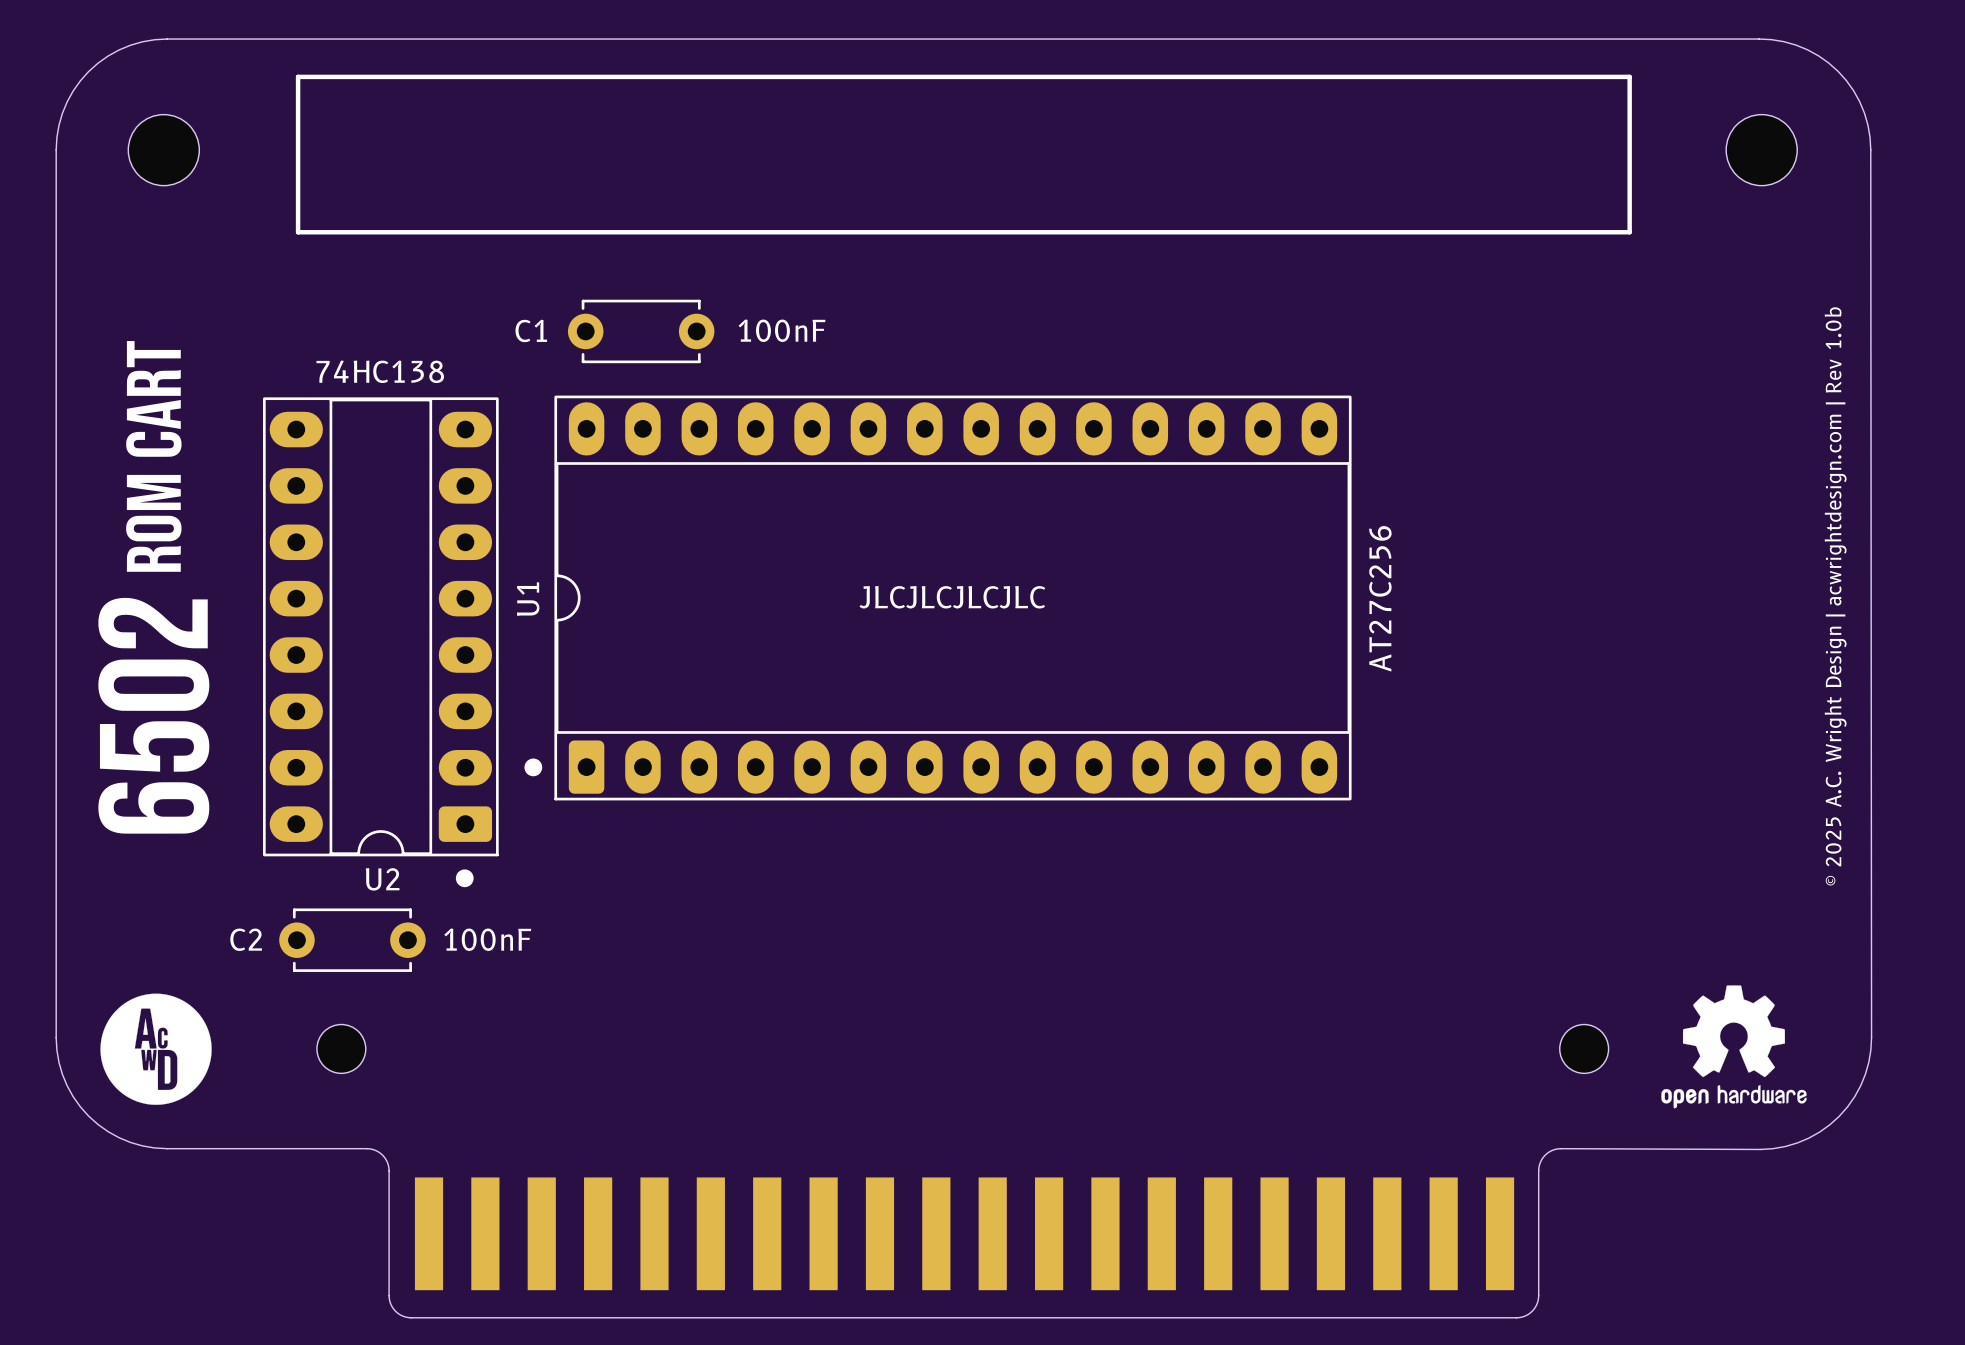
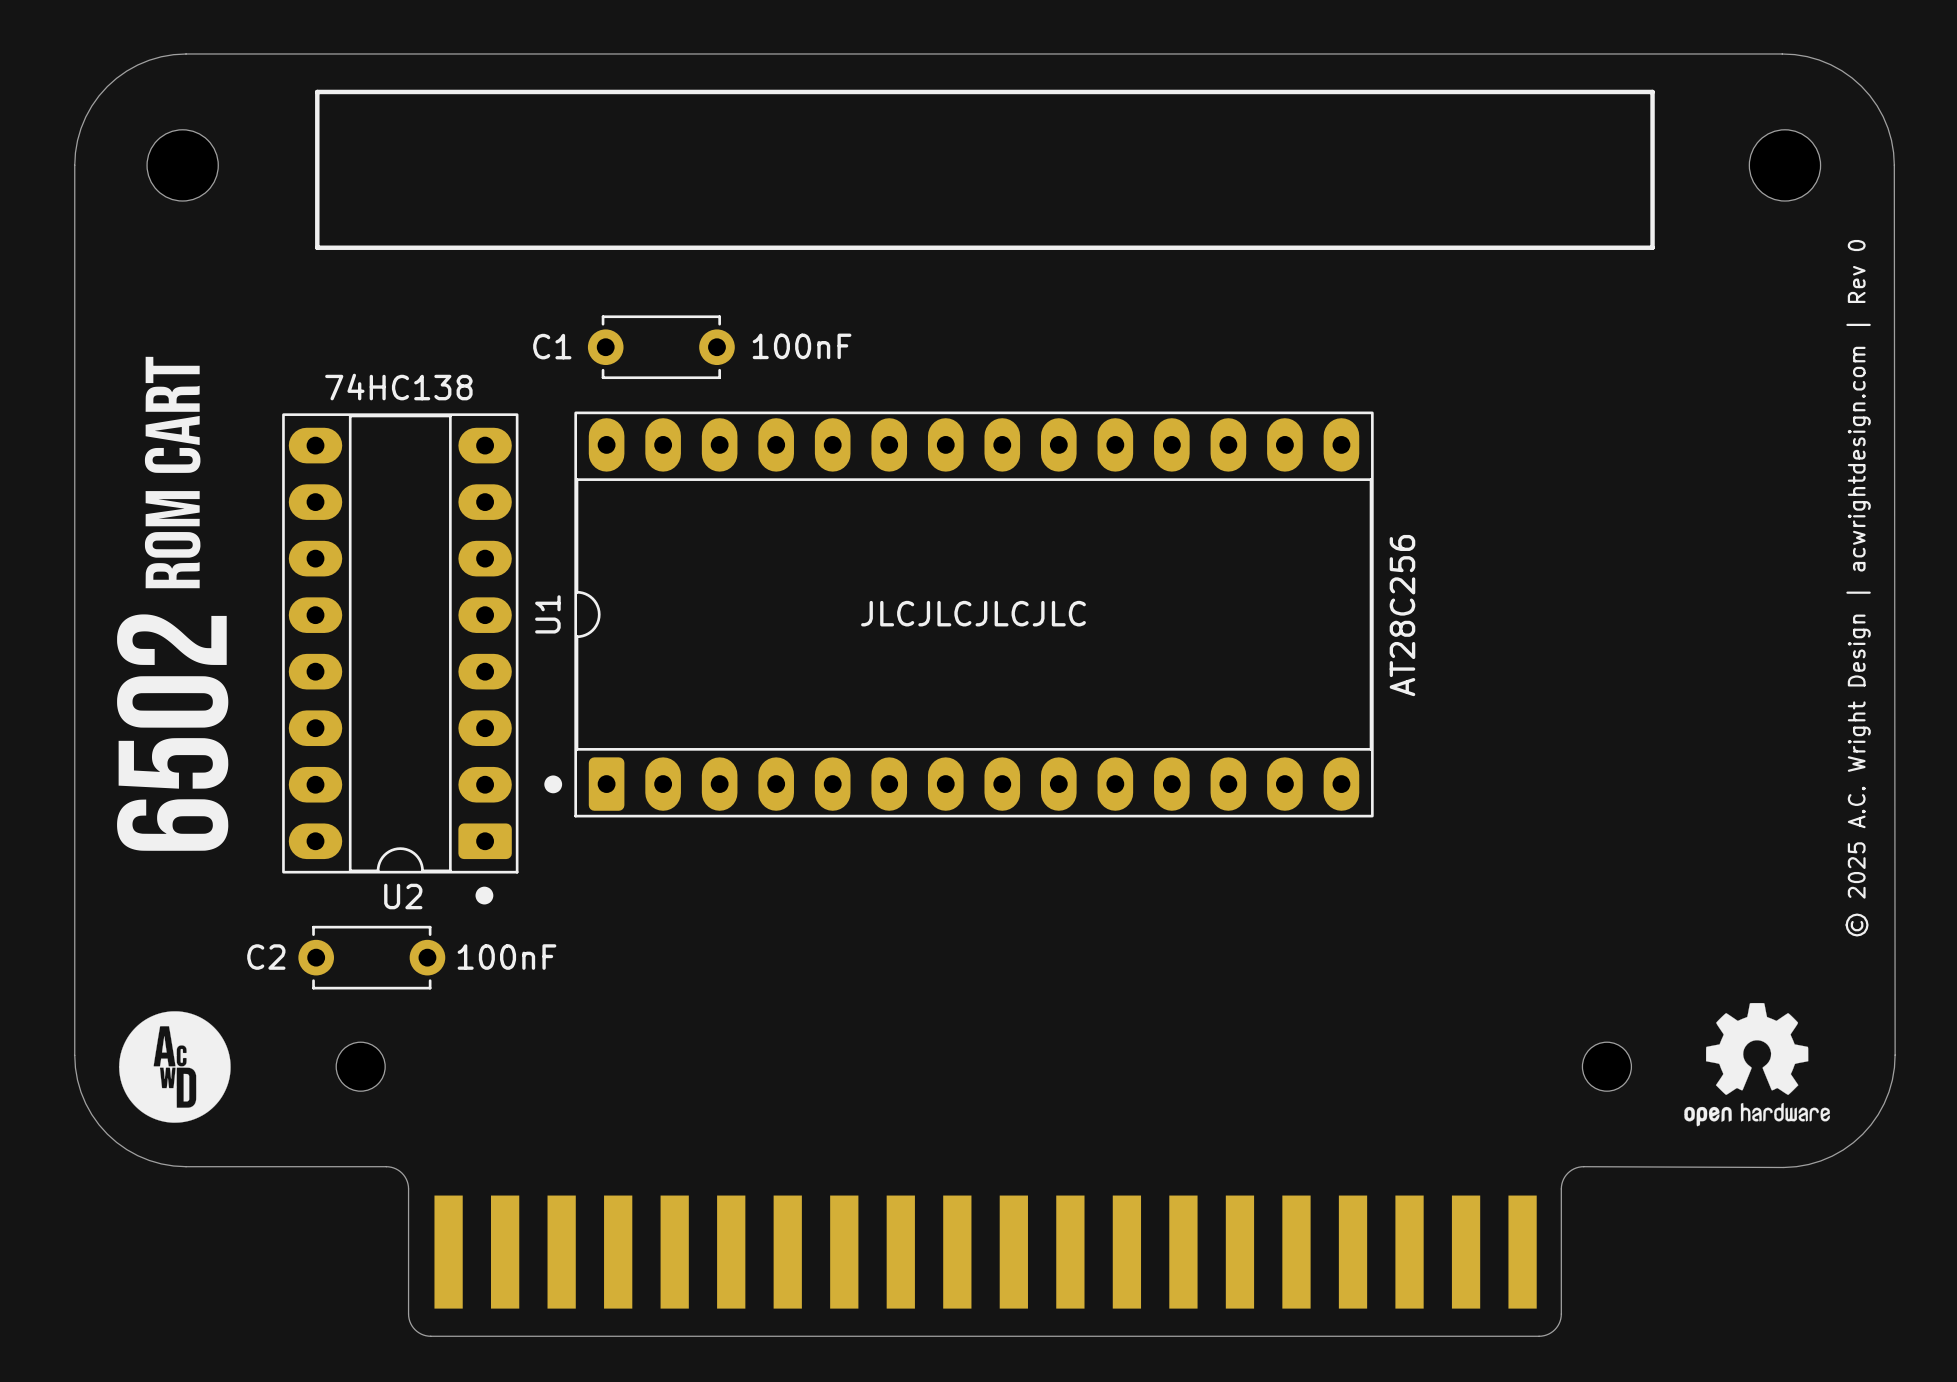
text: © 2025 A.C. Wright Design | acwrightdesign.com | Rev 1.0b (1835, 596) -> © 2025 A.C. Wright Design | acwrightdesign.com | Rev 0 (1858, 588)
U1 value: AT27C256 (1380, 598) -> AT28C256 (1402, 615)

